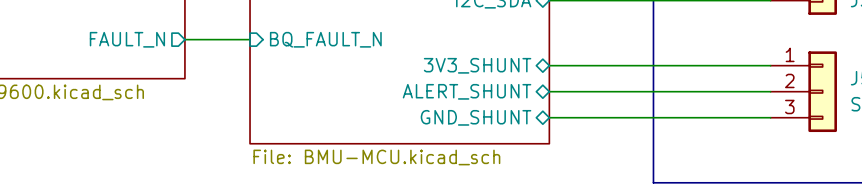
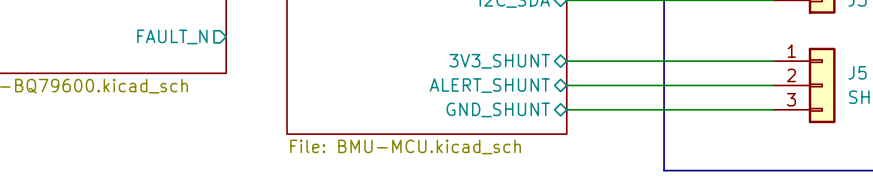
wire: (184, 39) (250, 39) -> none
sheet pin: BQ_FAULT_N (325, 39) -> none

